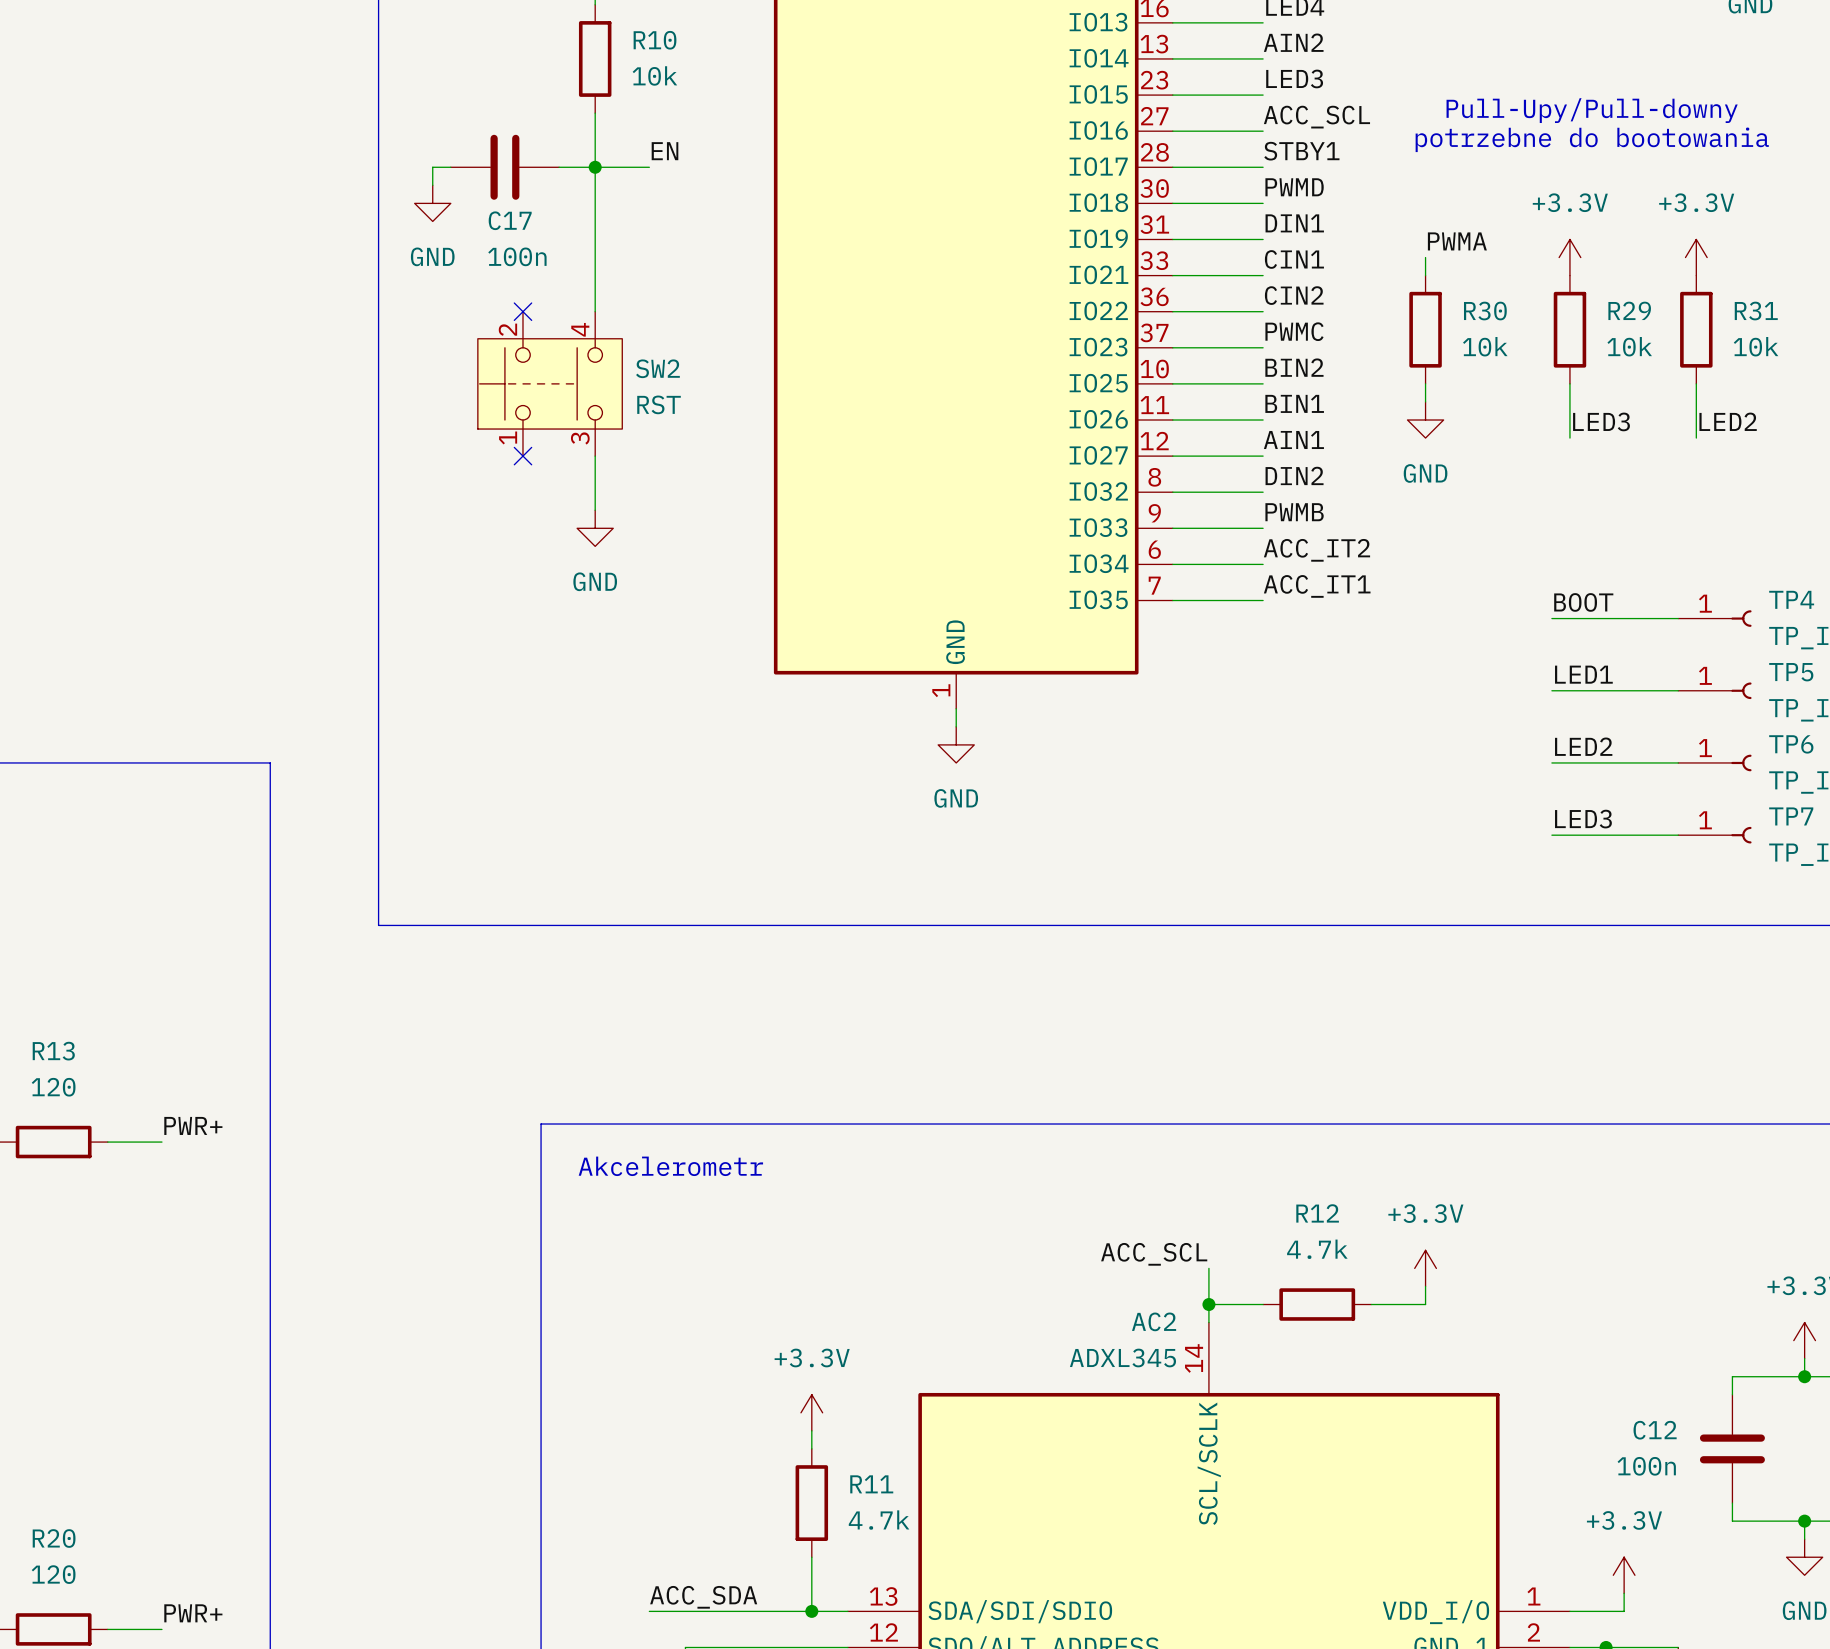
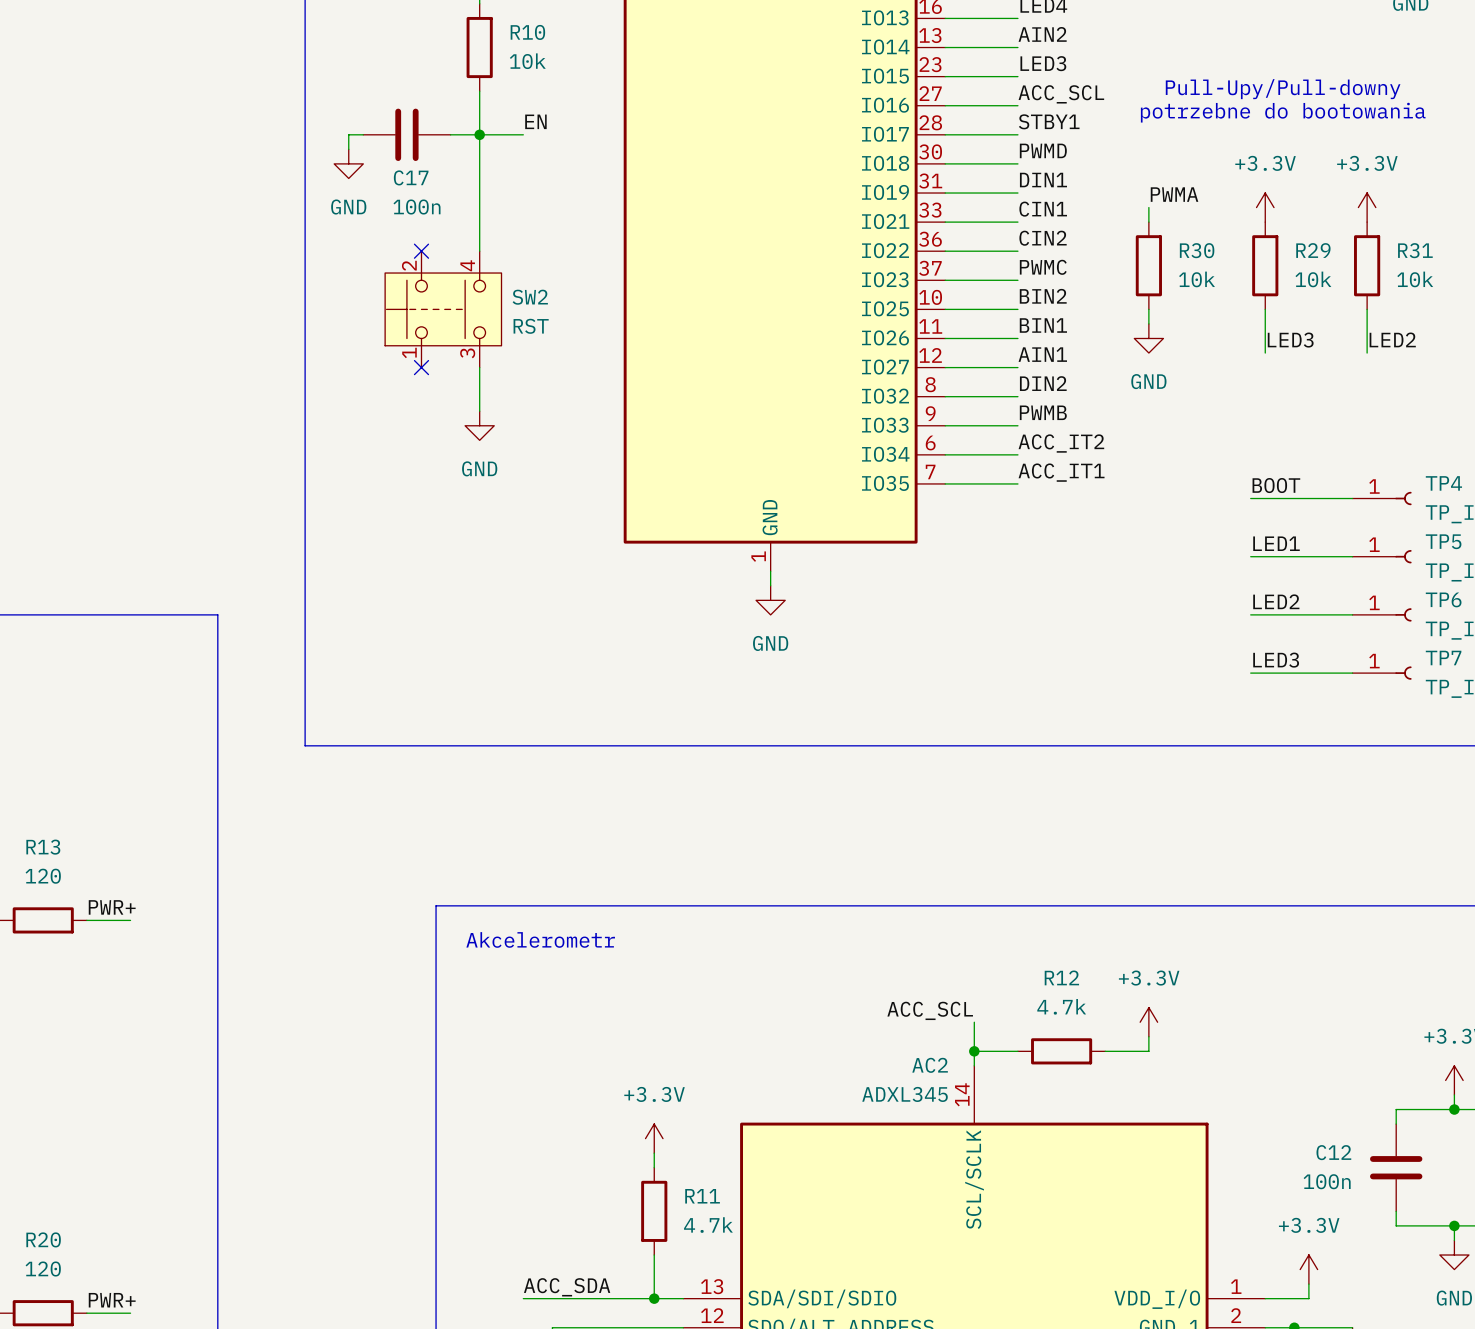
label position: PWR+ (193, 1125) -> PWR+ (112, 907)
label position: PWR+ (193, 1613) -> PWR+ (112, 1300)

